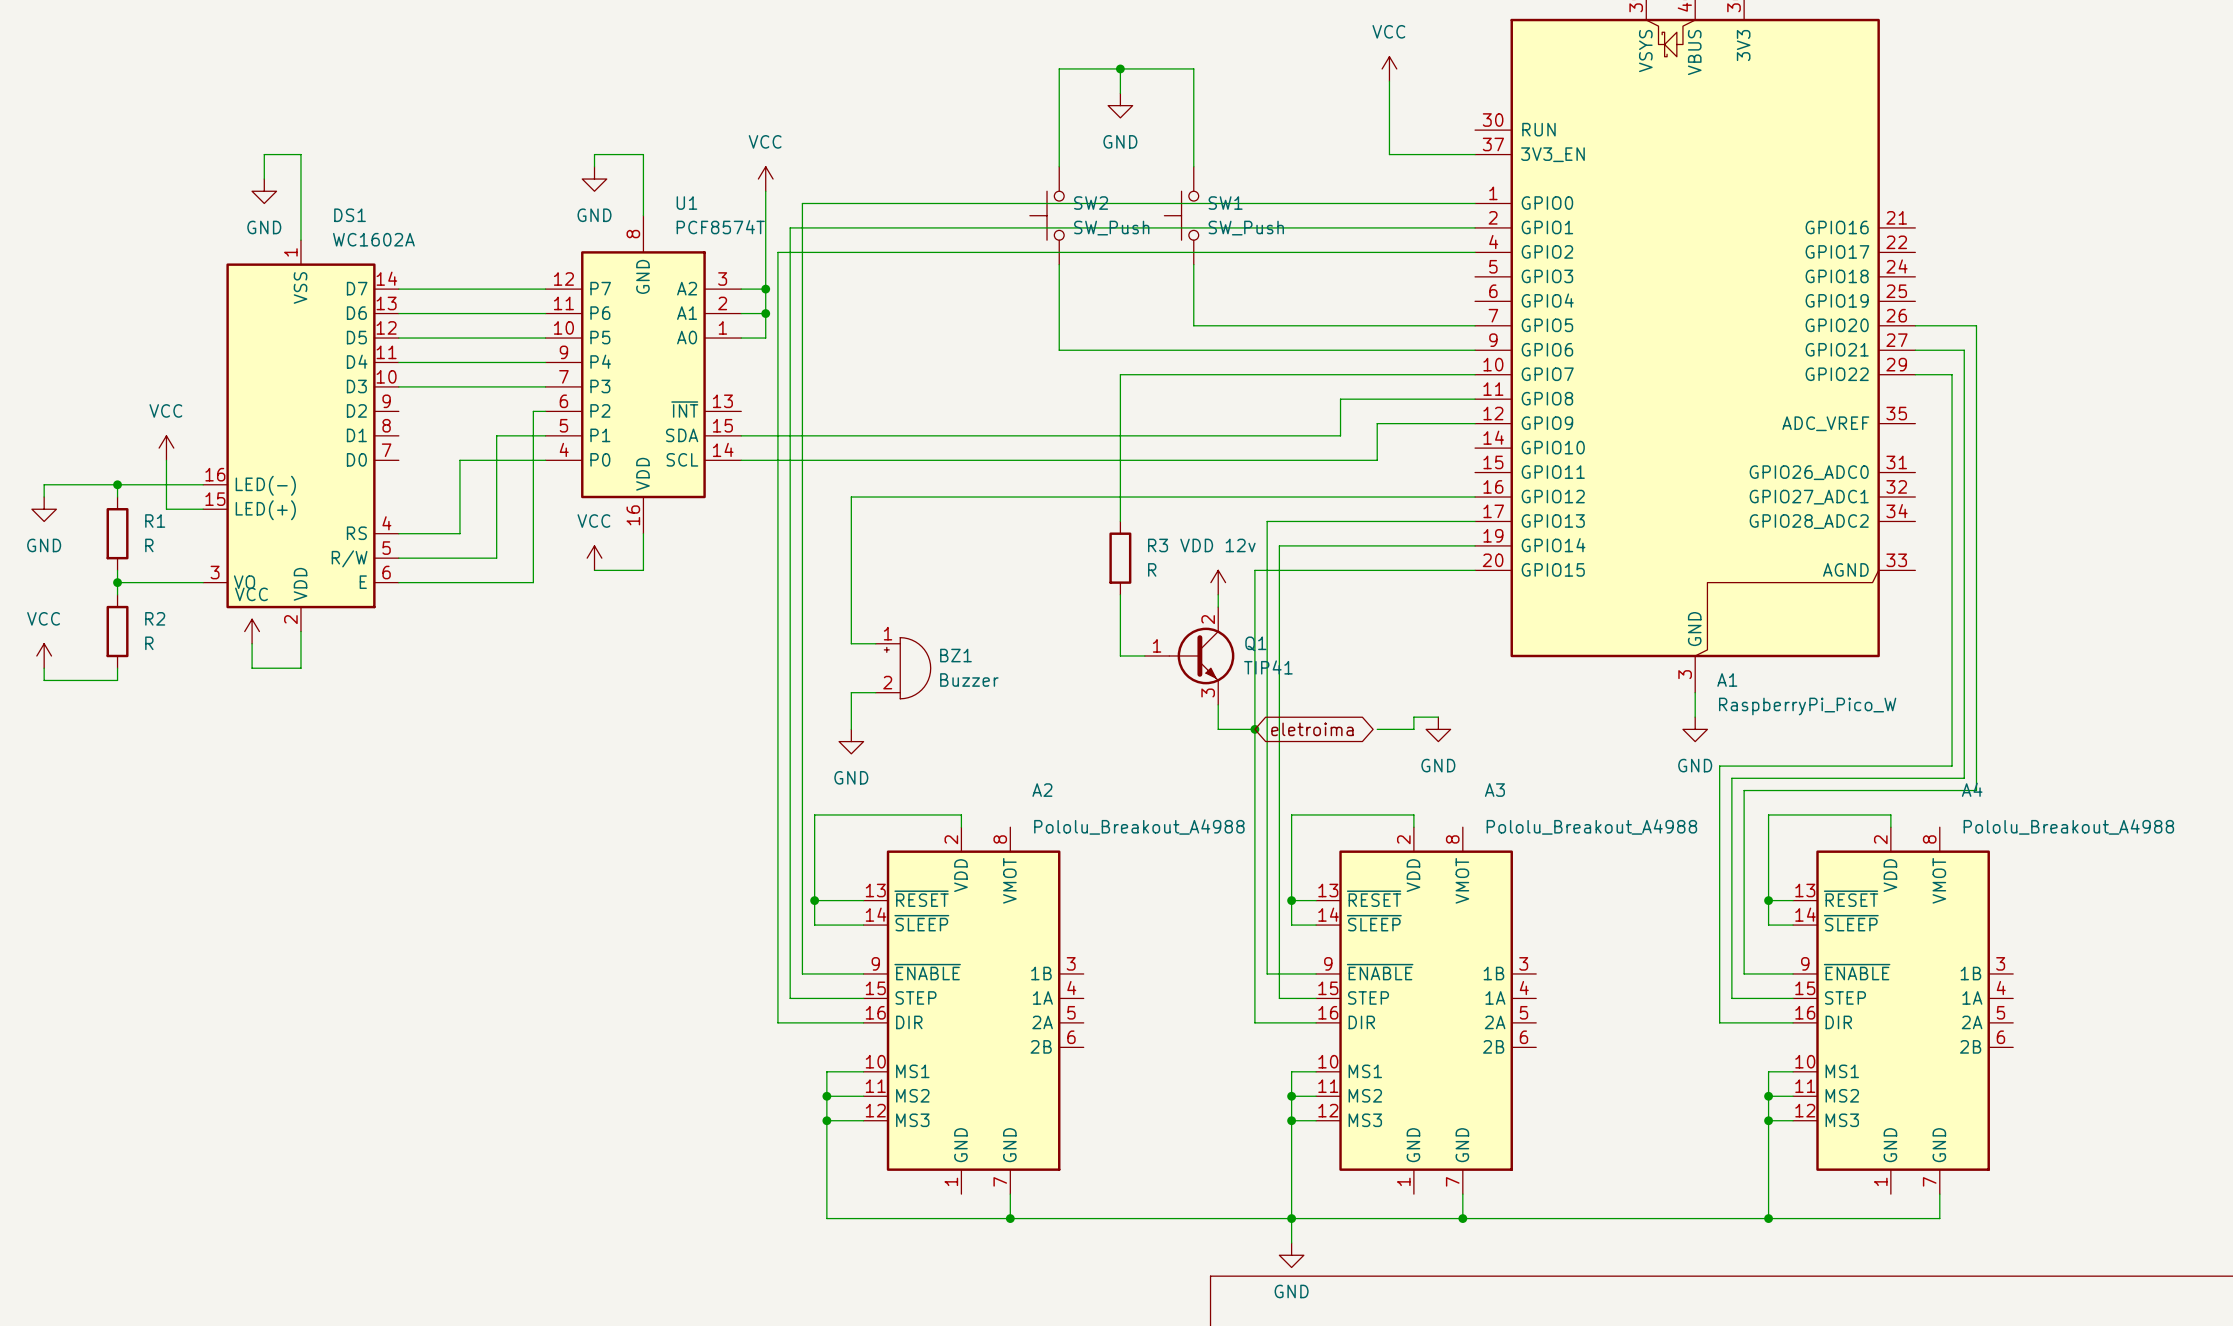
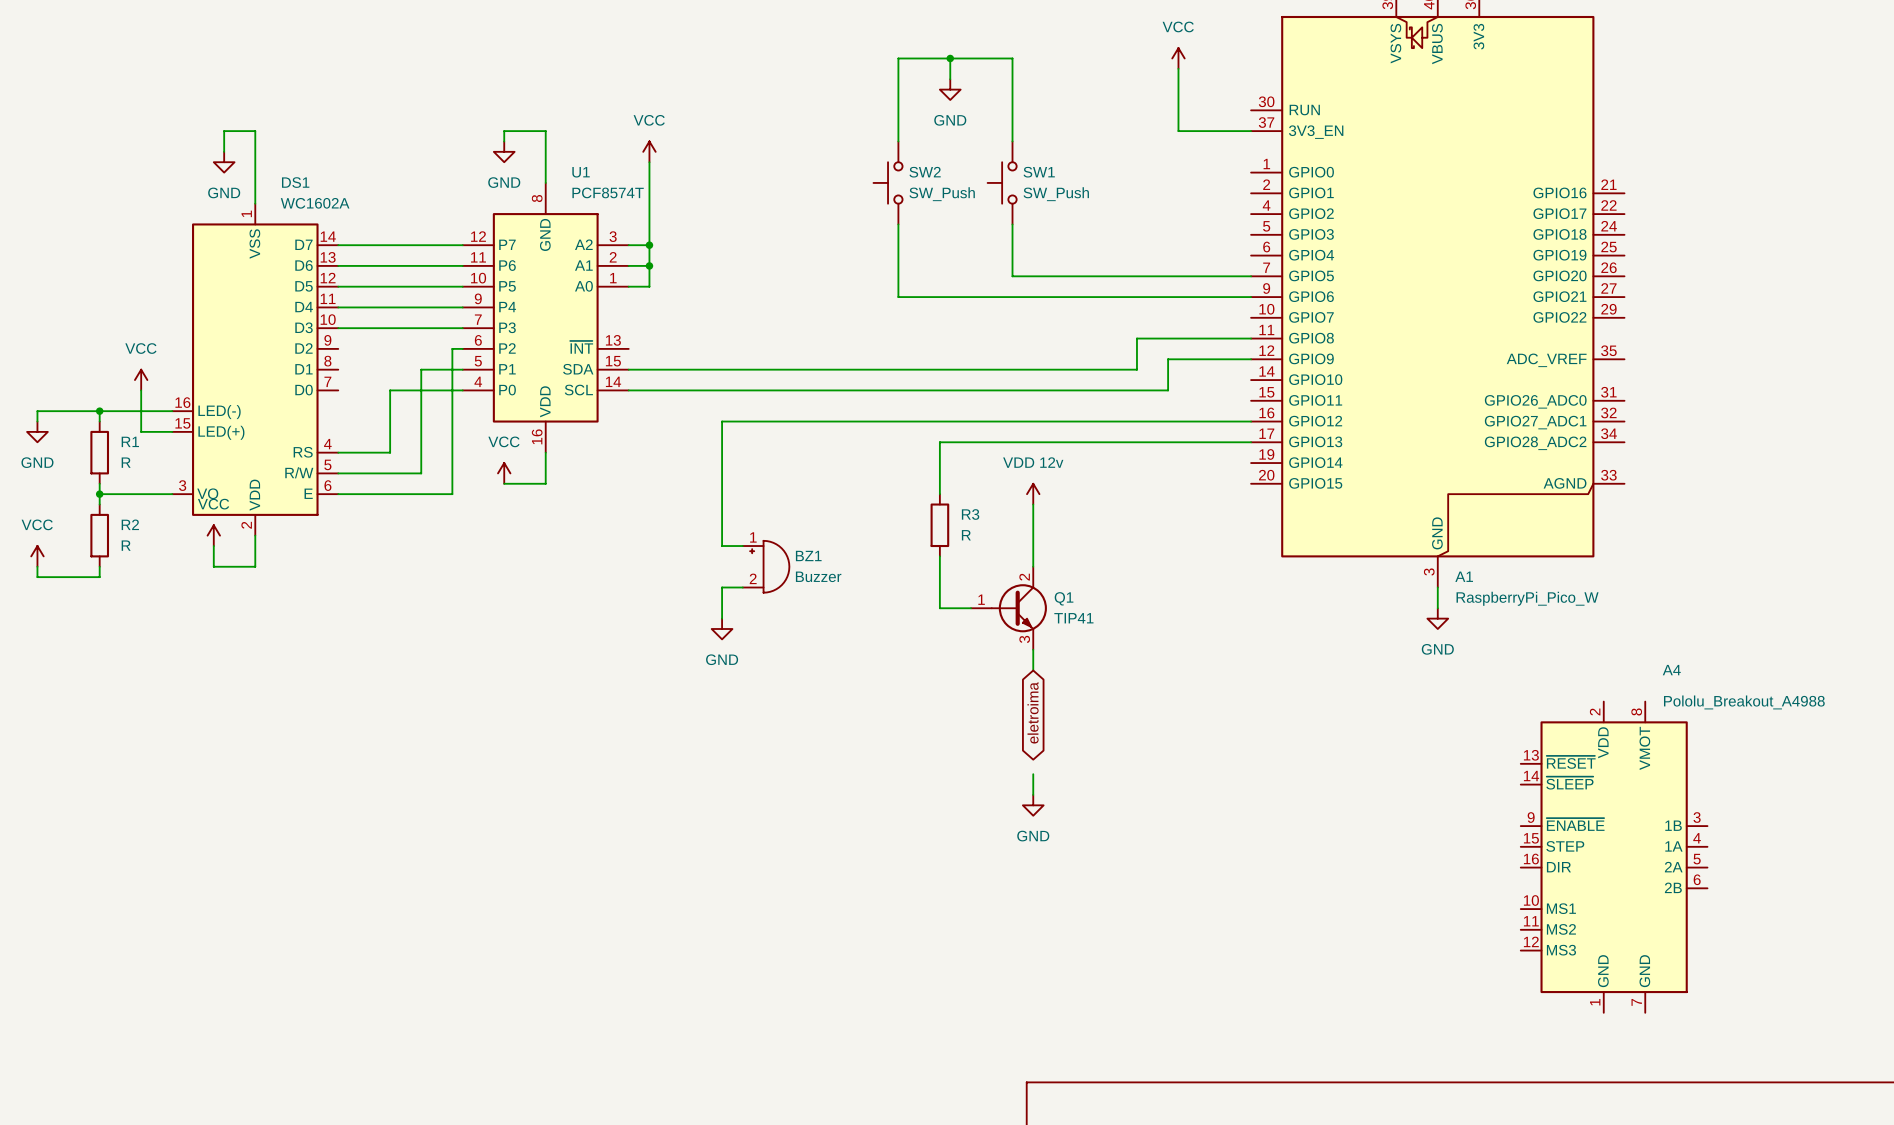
wire: (1475, 203) (802, 203) (802, 973) (863, 973) -> none
wire: (1475, 227) (790, 227) (790, 998) (863, 998) -> none
wire: (1475, 252) (777, 252) (777, 1022) (863, 1022) -> none
wire: (1915, 325) (1976, 325) (1976, 790) (1744, 790) (1744, 973) (1793, 973) -> none
wire: (1915, 350) (1964, 350) (1964, 778) (1731, 778) (1731, 998) (1793, 998) -> none
wire: (1475, 374) (1120, 374) (1120, 521) -> none
wire: (1915, 374) (1952, 374) (1952, 766) (1719, 766) (1719, 1022) (1793, 1022) -> none
wire: (1267, 521) (1267, 973) (1316, 973) -> (1074, 442) (939, 442) (939, 494)
wire: (1475, 545) (1279, 545) (1279, 998) (1316, 998) -> none
R3 position: (1120, 558) -> (939, 525)
wire: (1475, 570) (1254, 570) (1254, 1022) (1316, 1022) -> none
wire: (1120, 594) (1120, 655) (1144, 655) -> none
wire: none -> (1033, 514) (1033, 566)
wire: none -> (939, 556) (939, 608) (971, 608)
Q1 position: (1189, 655) -> (1008, 608)
wire: (1218, 704) (1218, 729) (1254, 729) -> none
wire: (1438, 717) (1413, 717) (1413, 729) (1377, 729) -> none
junction: (1254, 729) -> none
global label rotation: 0° (1312, 729) -> 90° clockwise (1033, 712)
global label position: eletroima (1312, 729) -> eletroima (1033, 712)
power symbol: GND (1438, 729) -> none
wire: none -> (1033, 649) (1033, 670)
wire: (961, 827) (961, 814) (814, 814) (814, 925) (863, 925) -> none
wire: (1413, 827) (1413, 814) (1291, 814) (1291, 925) (1316, 925) -> none
wire: (1890, 827) (1890, 814) (1768, 814) (1768, 925) (1793, 925) -> none
wire: (814, 900) (863, 900) -> none
junction: (814, 900) -> none
wire: (1291, 900) (1316, 900) -> none
junction: (1291, 900) -> none
wire: (1768, 900) (1793, 900) -> none
junction: (1768, 900) -> none
wire: none -> (1033, 774) (1033, 794)
power symbol: none -> GND (1033, 805)
A2: Pololu_Breakout_A4988 (973, 1010) -> none
A3: Pololu_Breakout_A4988 (1426, 1010) -> none
wire: (863, 1071) (826, 1071) (826, 1218) (1939, 1218) (1939, 1194) -> none
wire: (1316, 1071) (1291, 1071) (1291, 1243) -> none
wire: (1793, 1071) (1768, 1071) (1768, 1218) -> none
wire: (826, 1096) (863, 1096) -> none
junction: (826, 1096) -> none
wire: (1291, 1096) (1316, 1096) -> none
junction: (1291, 1096) -> none
wire: (1768, 1096) (1793, 1096) -> none
junction: (1768, 1096) -> none
wire: (826, 1120) (863, 1120) -> none
junction: (826, 1120) -> none
wire: (1291, 1120) (1316, 1120) -> none
junction: (1291, 1120) -> none
wire: (1768, 1120) (1793, 1120) -> none
junction: (1768, 1120) -> none
wire: (1010, 1194) (1010, 1218) -> none
wire: (1462, 1194) (1462, 1218) -> none
junction: (1010, 1218) -> none
junction: (1291, 1218) -> none
junction: (1462, 1218) -> none
junction: (1768, 1218) -> none
power symbol: GND (1291, 1255) -> none

